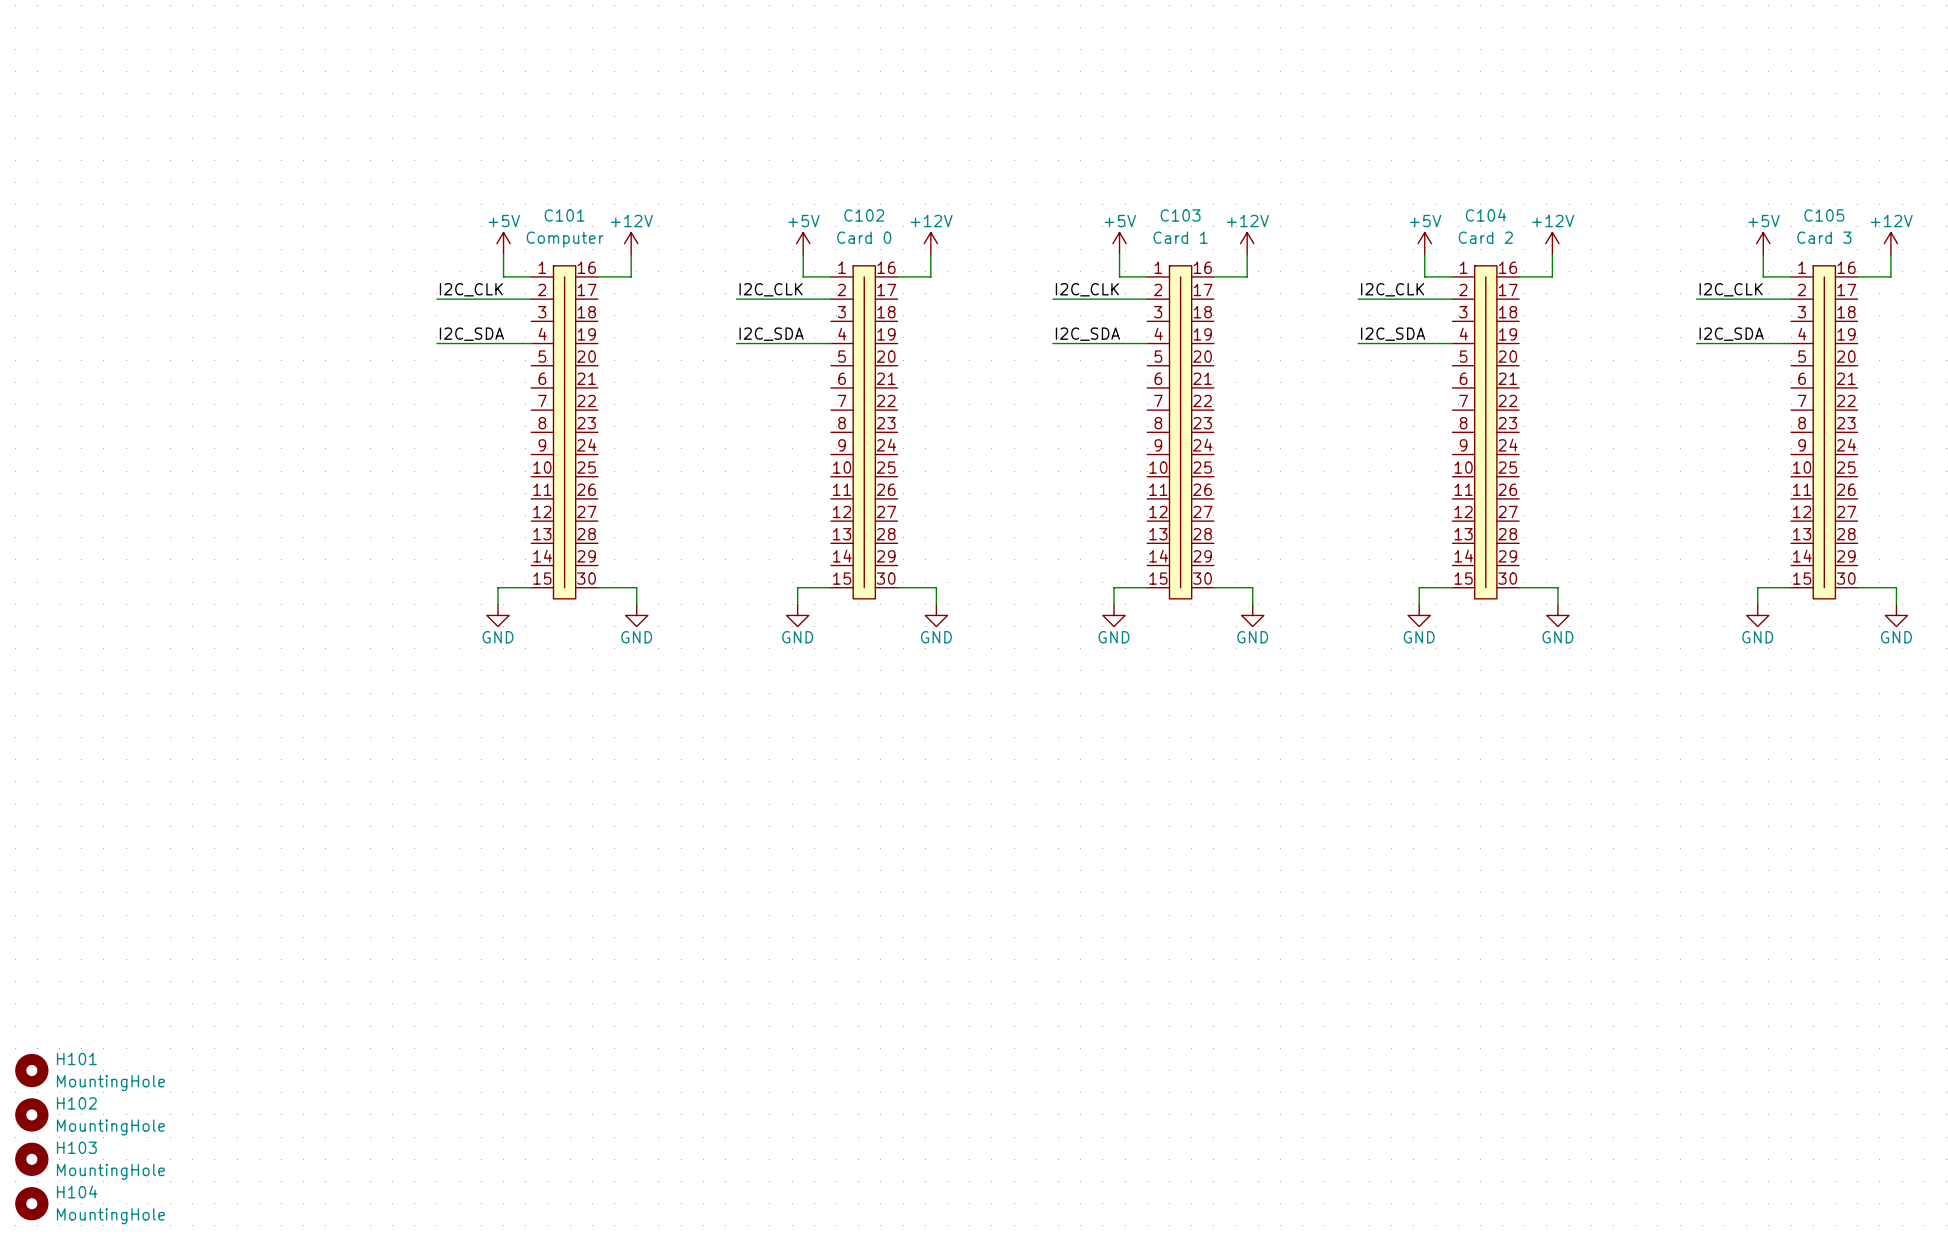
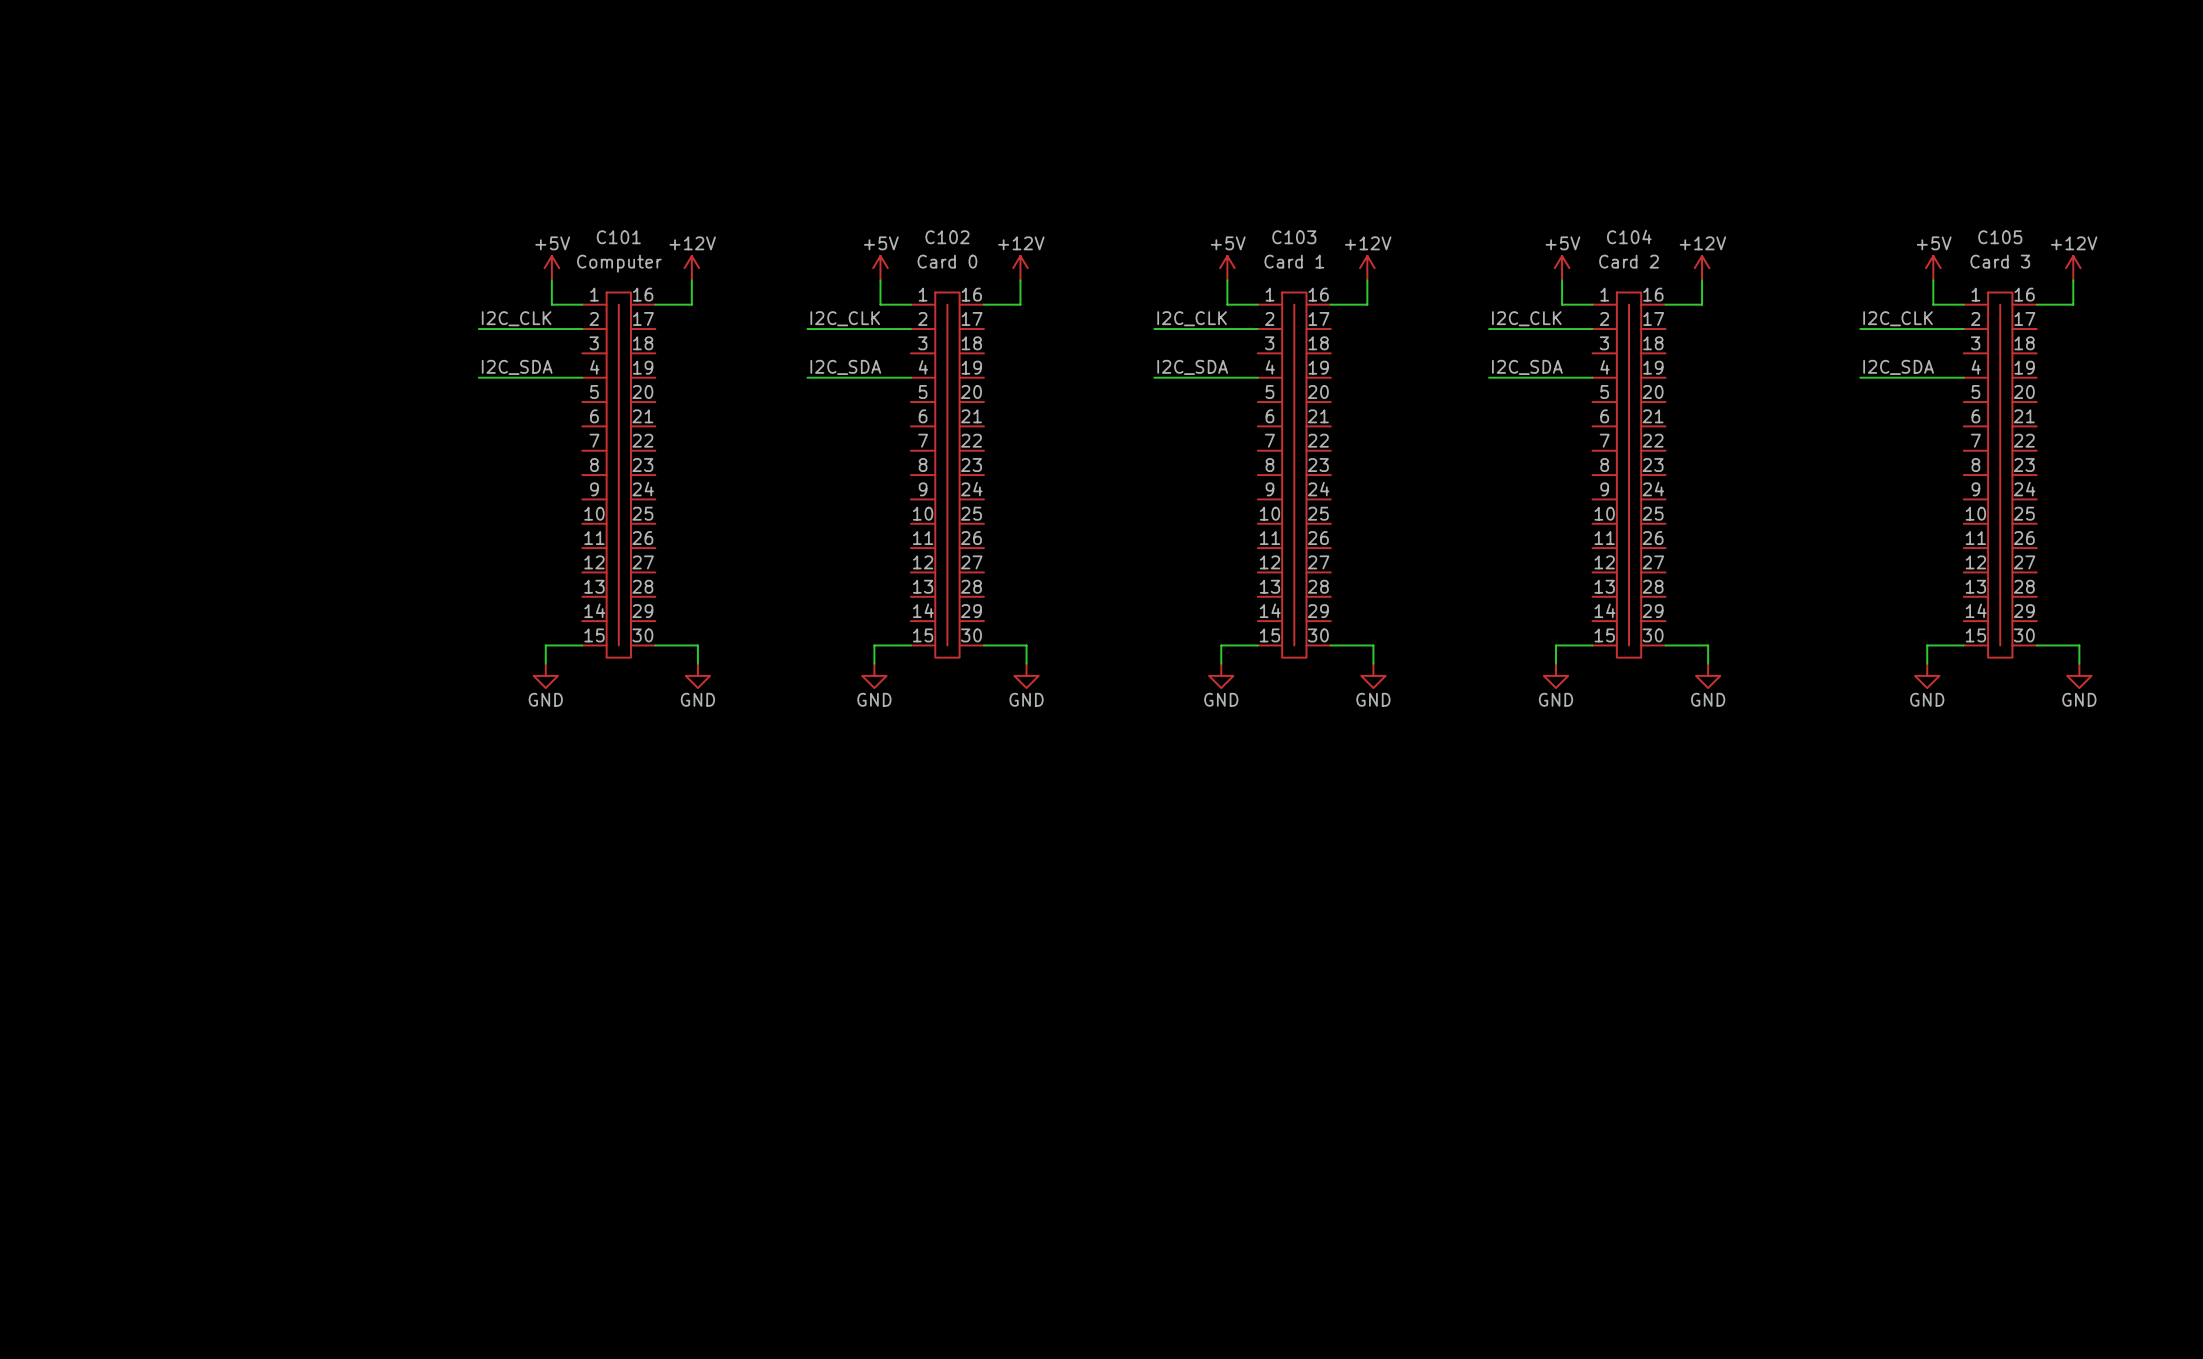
H101: MountingHole (31, 1070) -> none
H102: MountingHole (31, 1114) -> none
H103: MountingHole (31, 1159) -> none
H104: MountingHole (31, 1203) -> none

